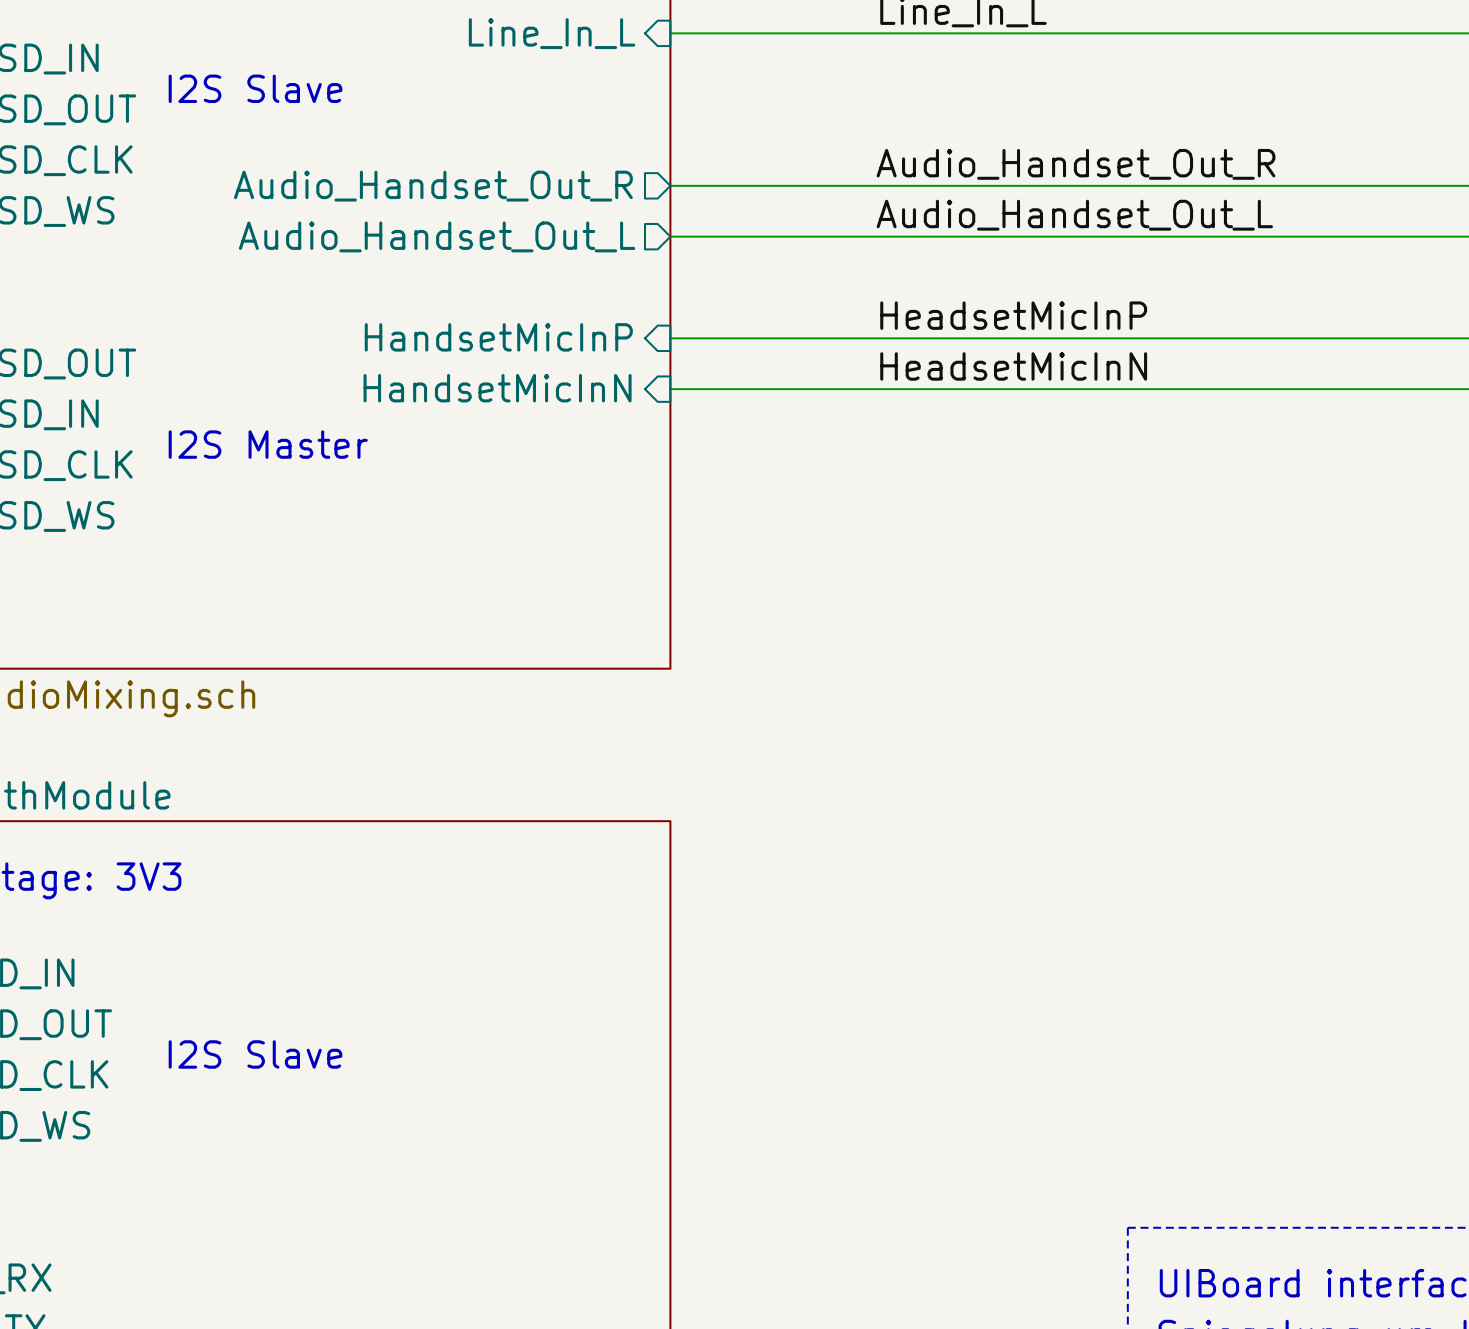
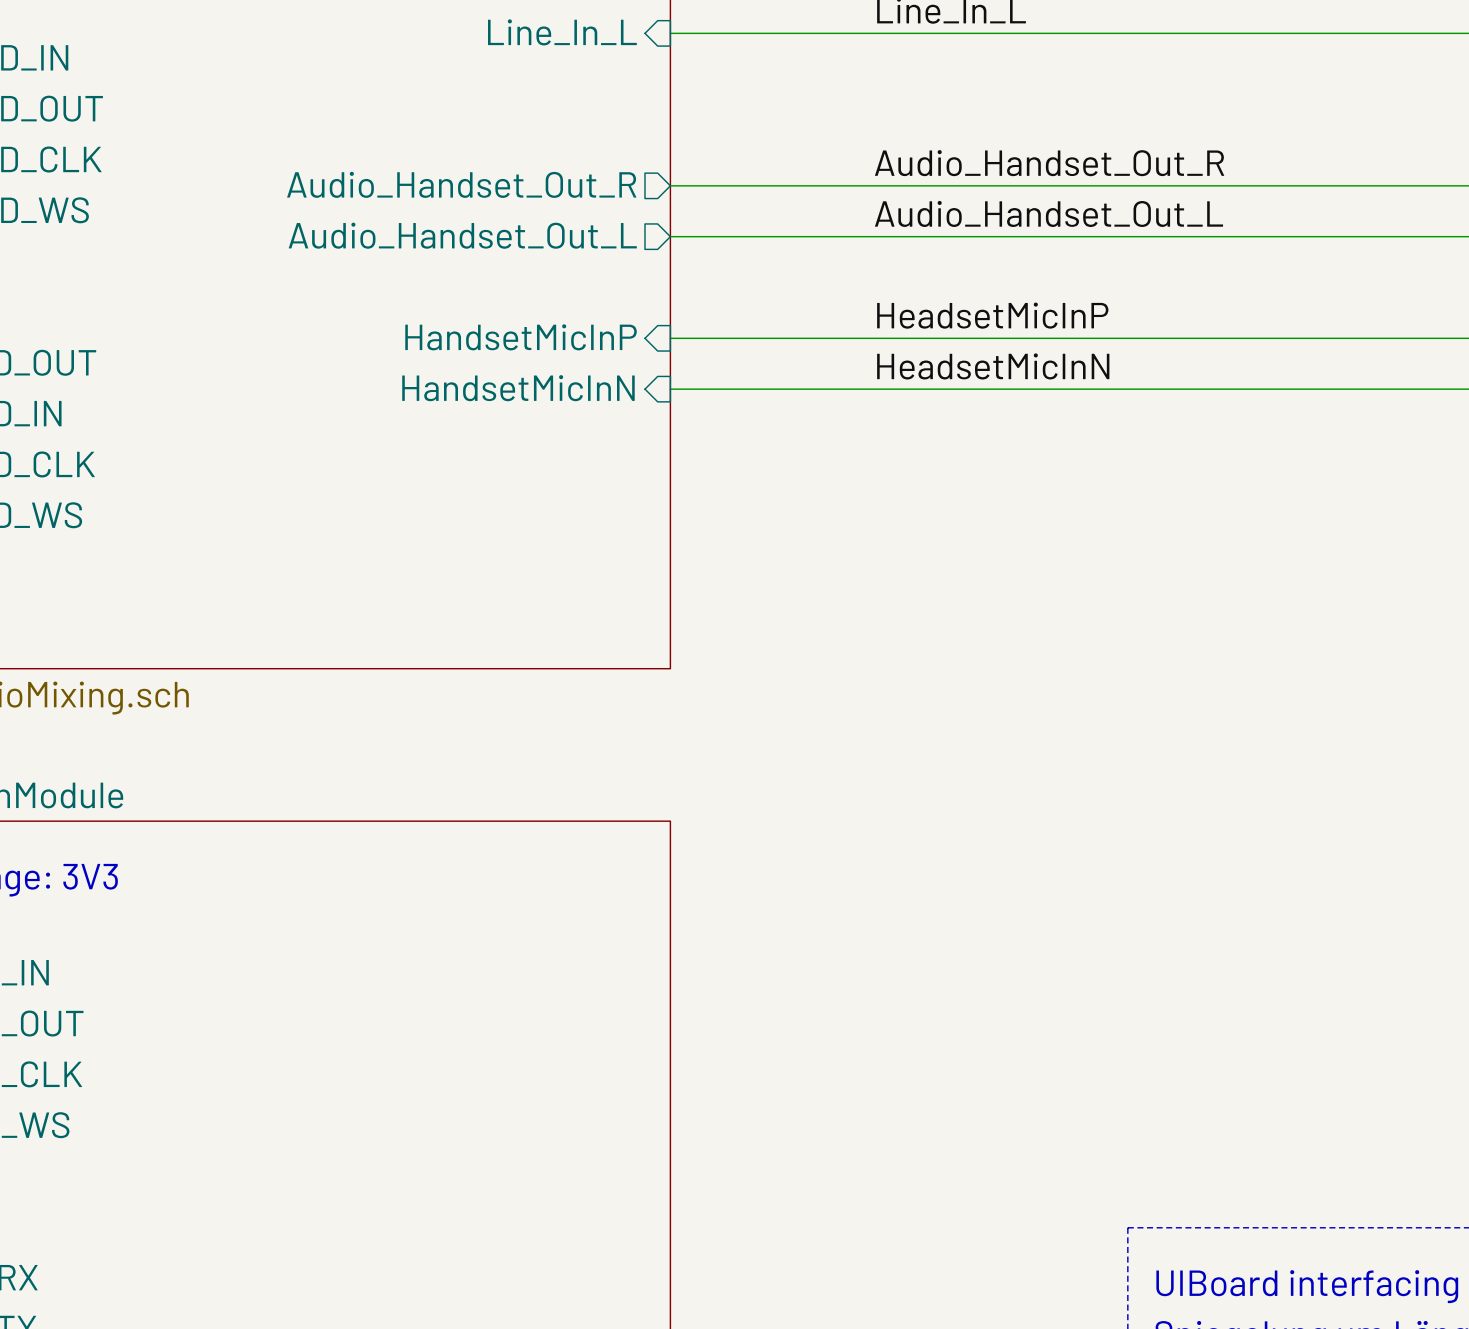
text: I2S Slave (255, 88) -> none
text: I2S Master (268, 444) -> none
text: I2S Slave (255, 1054) -> none

